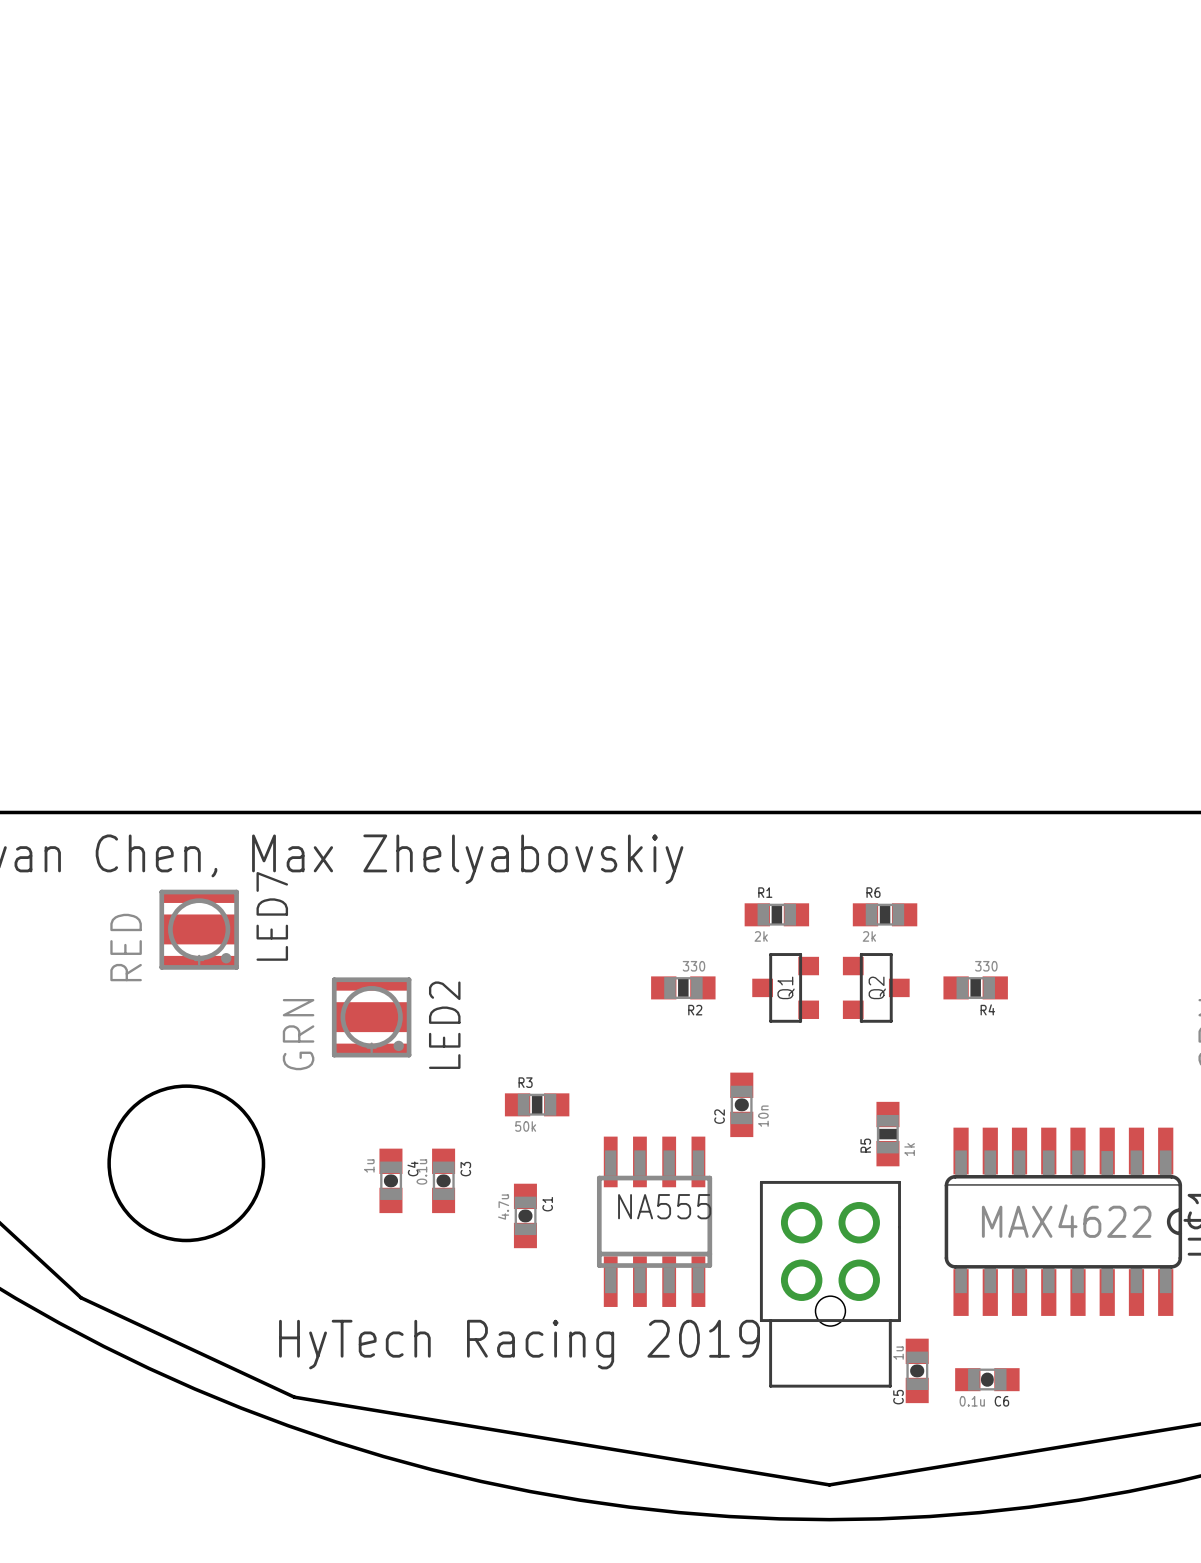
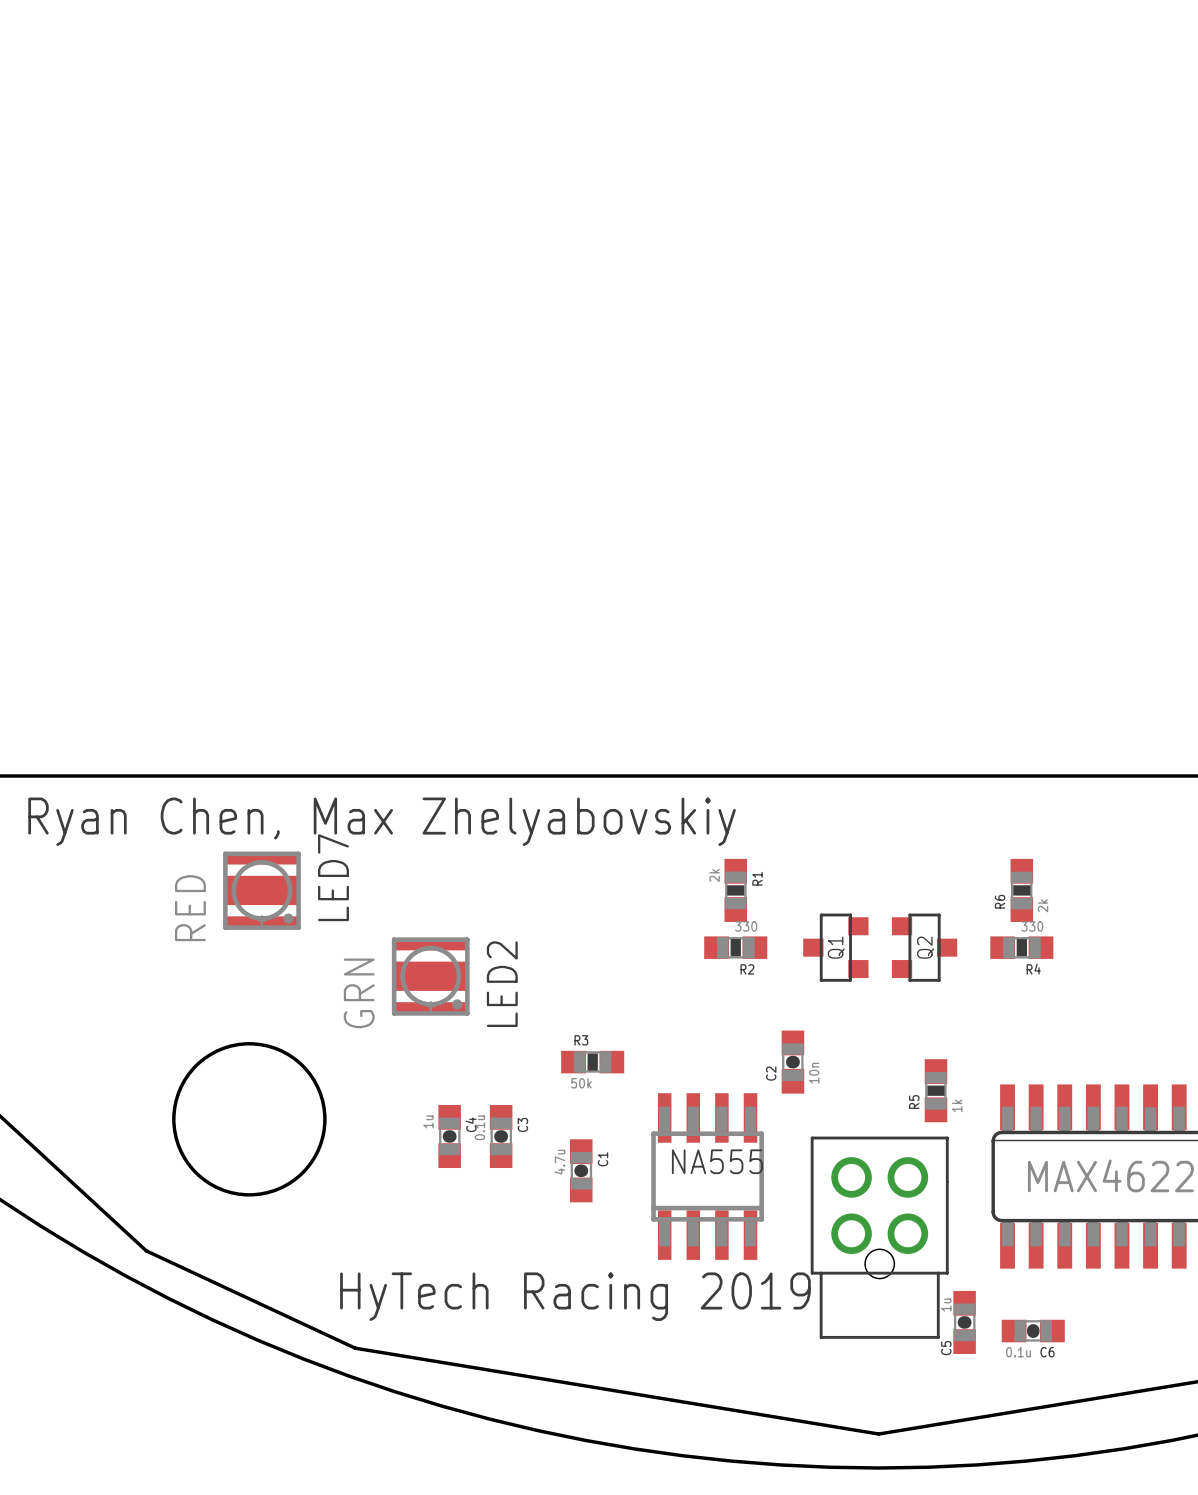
R1 rotation: 0° (776, 914) -> 90° clockwise (735, 890)
R1 position: (776, 914) -> (735, 890)
R6 rotation: 0° (885, 914) -> 90° clockwise (1021, 890)
R6 position: (885, 914) -> (1021, 890)

